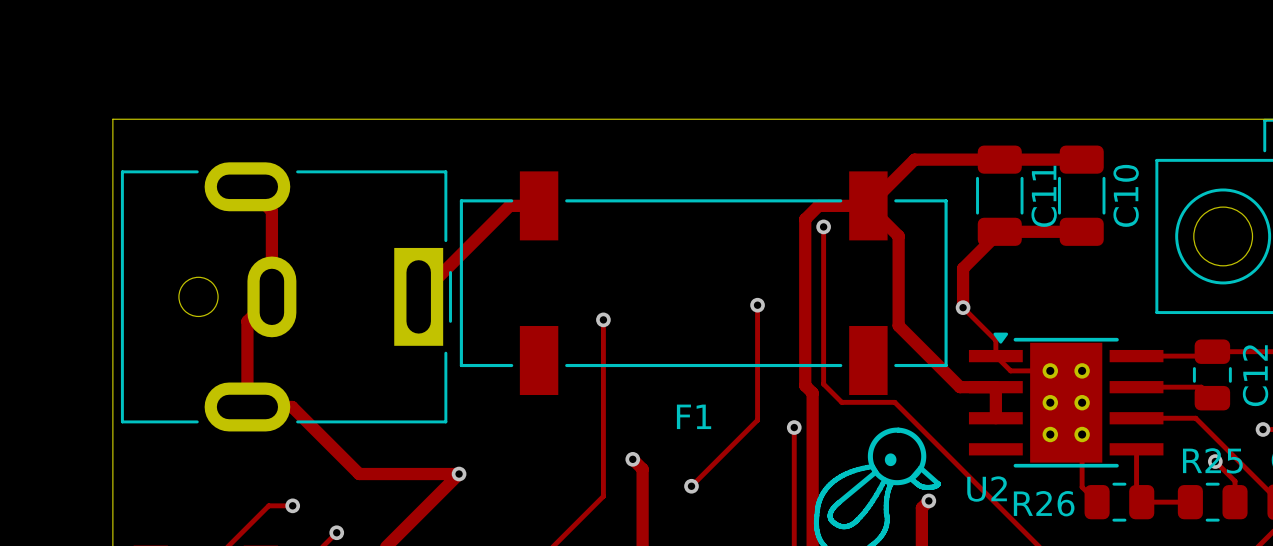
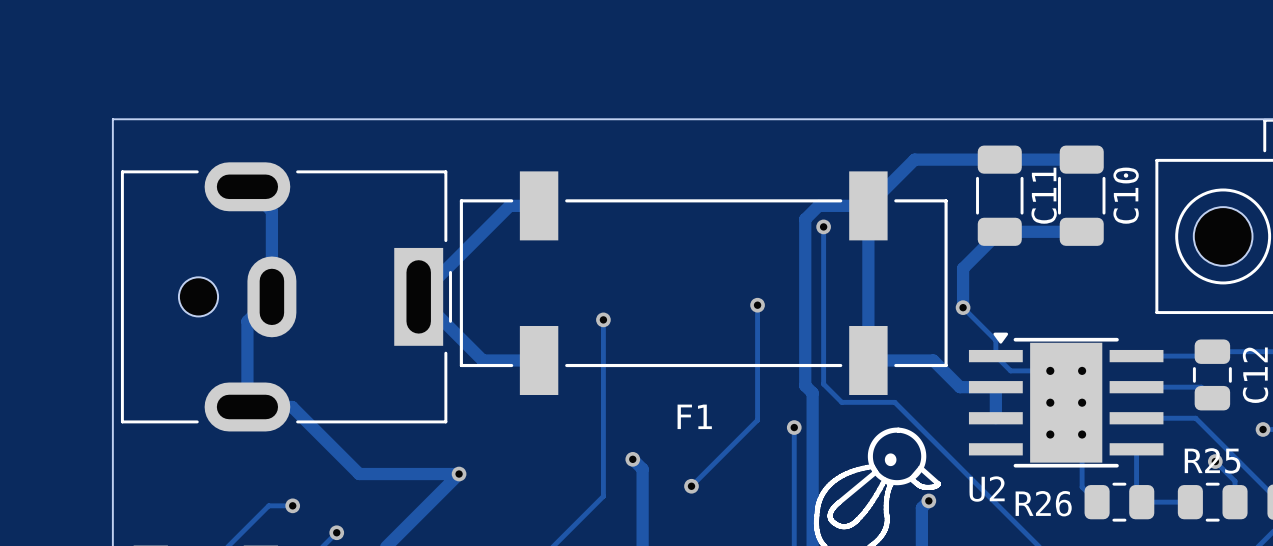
track: (868, 205) (898, 236) (898, 325) (933, 360) -> (868, 205) (868, 360) (933, 360)
track: none -> (419, 296) (482, 360) (539, 360)

